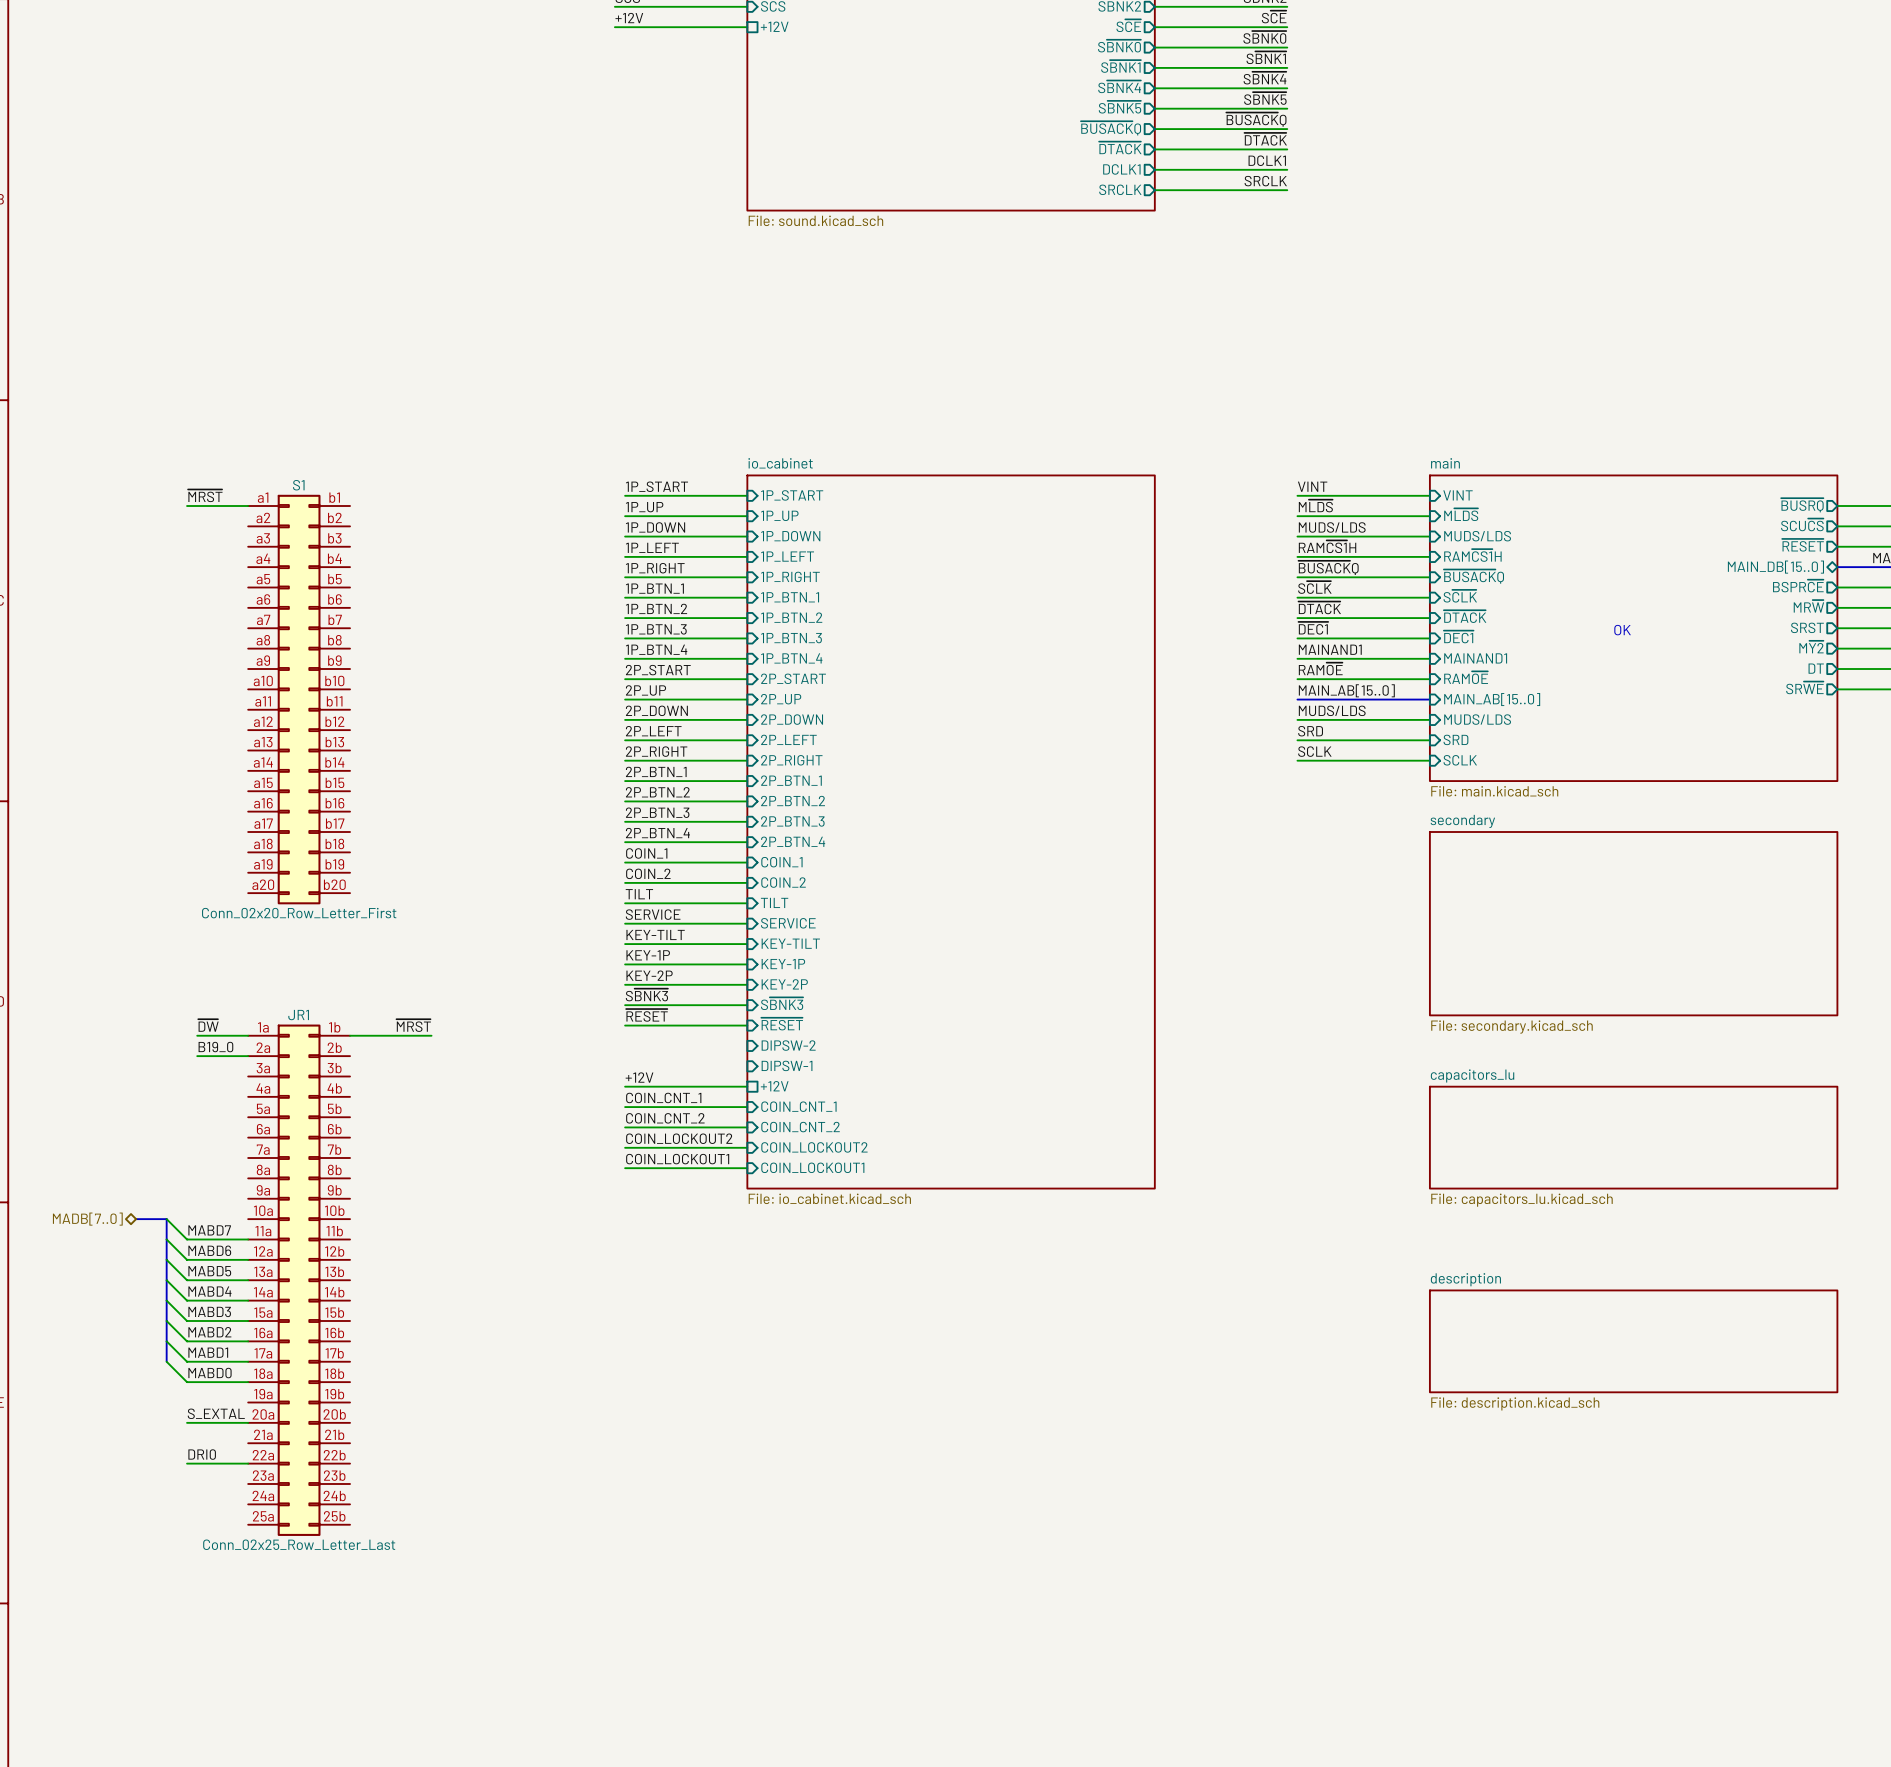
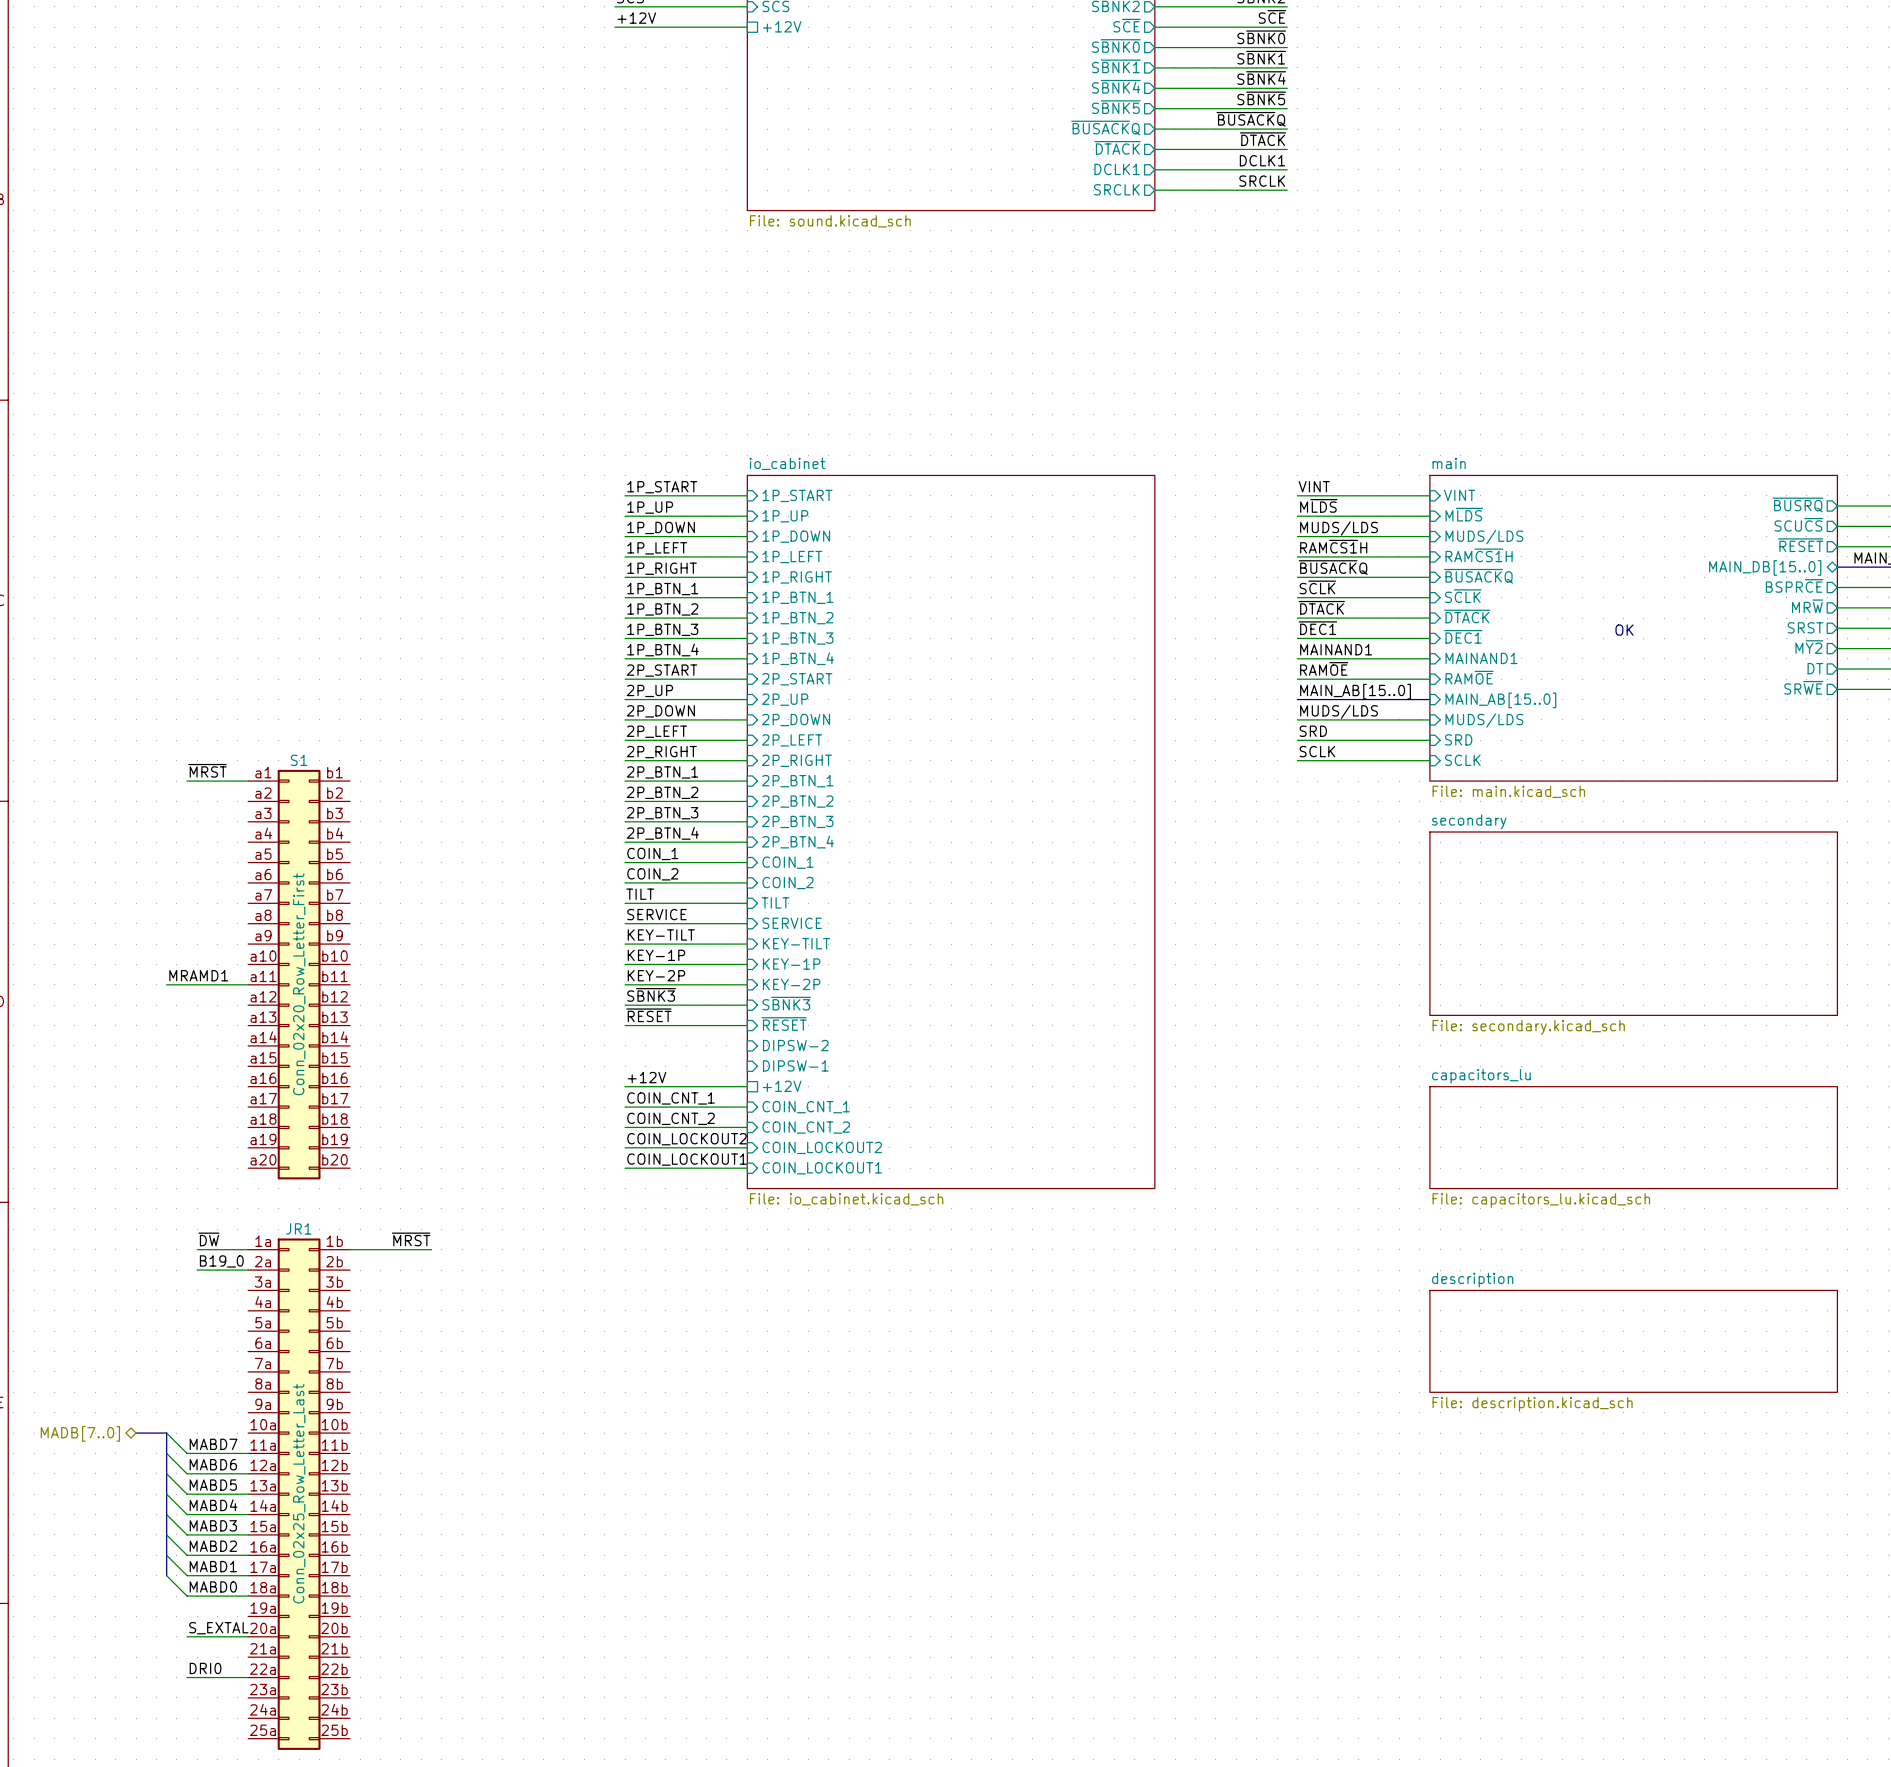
label: ~{MRST} (205, 495) -> none
wire: (187, 506) (248, 506) -> none
S1 position: (299, 699) -> (299, 974)
label: none -> ~{MRST} (207, 770)
wire: none -> (187, 781) (248, 781)
S1 value rotation: 0° (299, 913) -> 90° counterclockwise (299, 984)
label: none -> MRAMD1 (198, 975)
label: ~{DW} (208, 1025) -> none
label: ~{MRST} (413, 1025) -> none
wire: (197, 1035) (248, 1035) -> none
wire: (350, 1035) (431, 1035) -> (166, 984) (248, 984)
label: B19_0 (215, 1047) -> none
wire: (197, 1056) (248, 1056) -> (197, 1249) (248, 1249)
hierarchical label: MADB[7..0] (87, 1219) -> none
bus: (136, 1219) (166, 1219) (166, 1361) -> none
wire: (166, 1219) (187, 1239) (248, 1239) -> none
label: MABD7 (209, 1230) -> none
wire: (166, 1239) (187, 1259) (248, 1259) -> (166, 1433) (187, 1453) (248, 1453)
label: none -> ~{DW} (208, 1239)
label: none -> ~{MRST} (411, 1239)
wire: none -> (350, 1249) (431, 1249)
label: MABD6 (209, 1250) -> none
wire: (166, 1259) (187, 1280) (248, 1280) -> (166, 1453) (187, 1473) (248, 1473)
label: none -> B19_0 (221, 1261)
wire: none -> (197, 1270) (248, 1270)
label: MABD5 (209, 1271) -> none
wire: (166, 1280) (187, 1300) (248, 1300) -> (166, 1473) (187, 1494) (248, 1494)
JR1 position: (299, 1280) -> (299, 1494)
label: MABD4 (209, 1291) -> none
wire: (166, 1300) (187, 1320) (248, 1320) -> (166, 1494) (187, 1514) (248, 1514)
label: MABD3 (209, 1311) -> none
wire: (166, 1320) (187, 1341) (248, 1341) -> (166, 1514) (187, 1534) (248, 1534)
label: MABD2 (209, 1332) -> none
wire: (166, 1341) (187, 1361) (248, 1361) -> (166, 1534) (187, 1555) (248, 1555)
label: MABD1 (208, 1352) -> none
wire: (166, 1361) (187, 1382) (248, 1382) -> (166, 1555) (187, 1575) (248, 1575)
label: MABD0 (209, 1373) -> none
label: S_EXTAL (216, 1413) -> none
wire: (187, 1422) (248, 1422) -> none
hierarchical label: none -> MADB[7..0] (80, 1433)
bus: none -> (136, 1433) (166, 1433) (166, 1575)
label: none -> MABD7 (213, 1444)
label: DRI0 (202, 1454) -> none
wire: (187, 1463) (248, 1463) -> (187, 1636) (248, 1636)
label: none -> MABD6 (213, 1464)
label: none -> MABD5 (213, 1485)
label: none -> MABD4 (213, 1505)
label: none -> MABD3 (213, 1525)
JR1 value rotation: 0° (299, 1544) -> 90° counterclockwise (299, 1493)
label: none -> MABD2 (213, 1546)
label: none -> MABD1 (213, 1566)
wire: none -> (166, 1575) (187, 1596) (248, 1596)
label: none -> MABD0 (213, 1586)
label: none -> S_EXTAL (218, 1628)
label: none -> DRI0 (205, 1668)
wire: none -> (187, 1677) (248, 1677)

